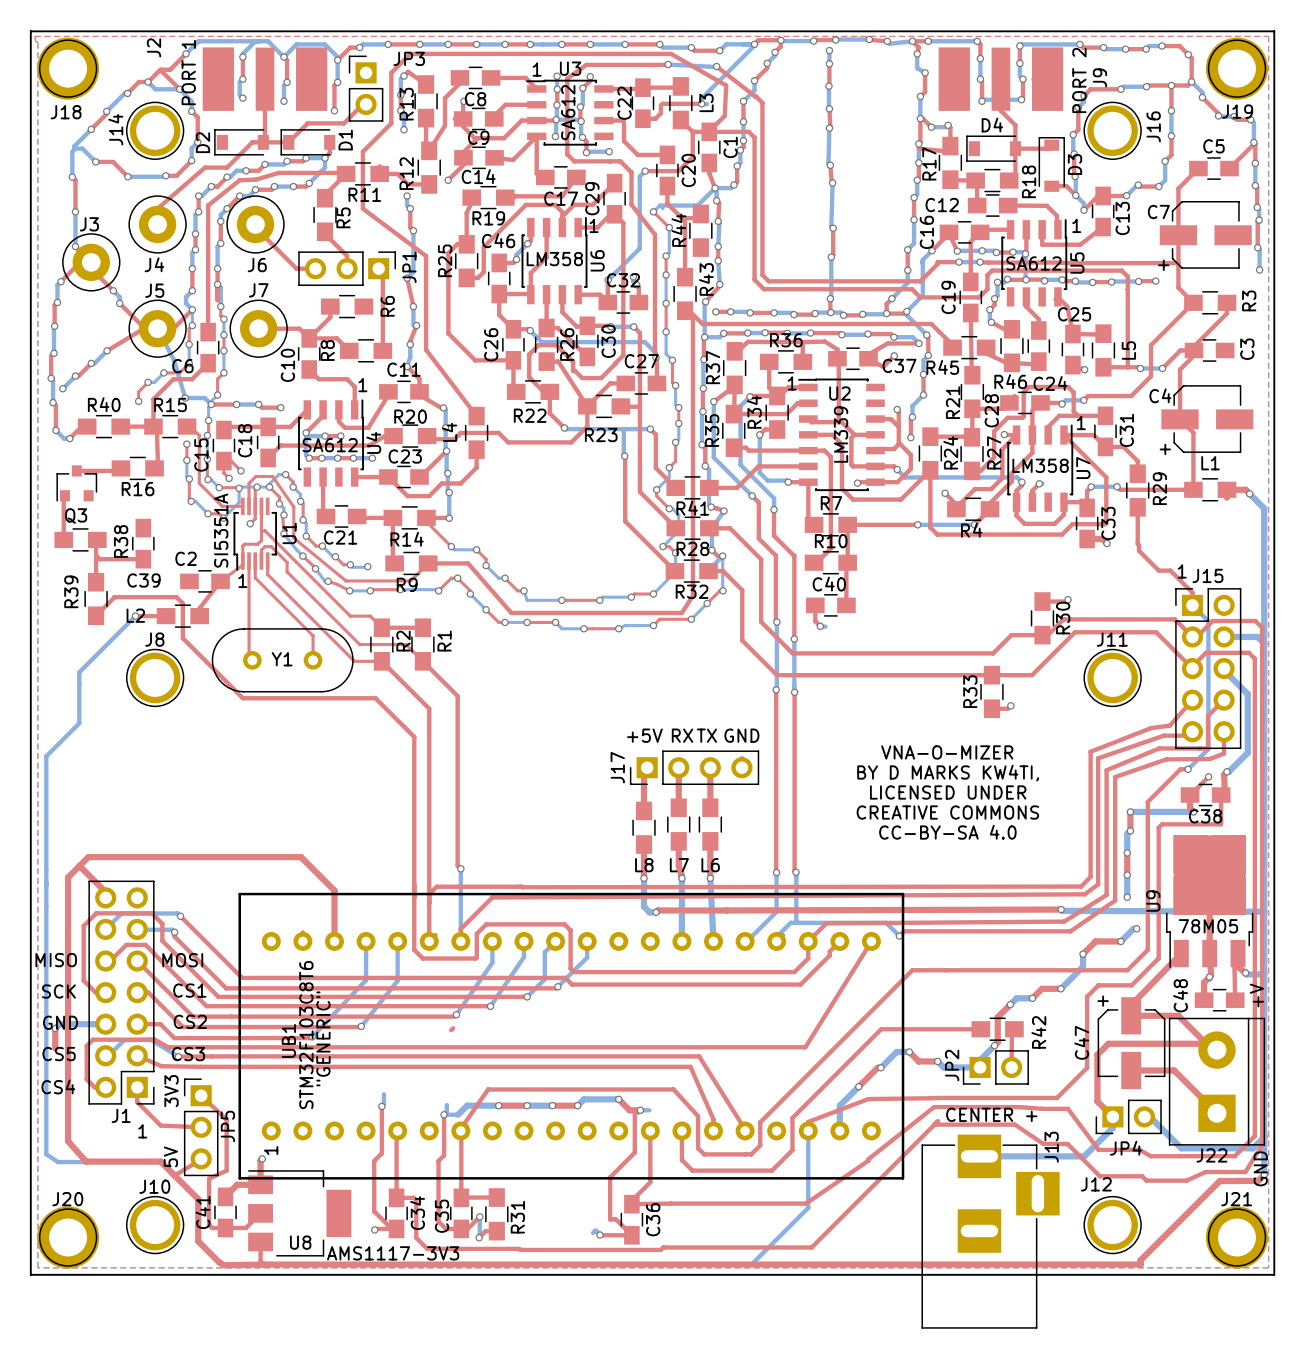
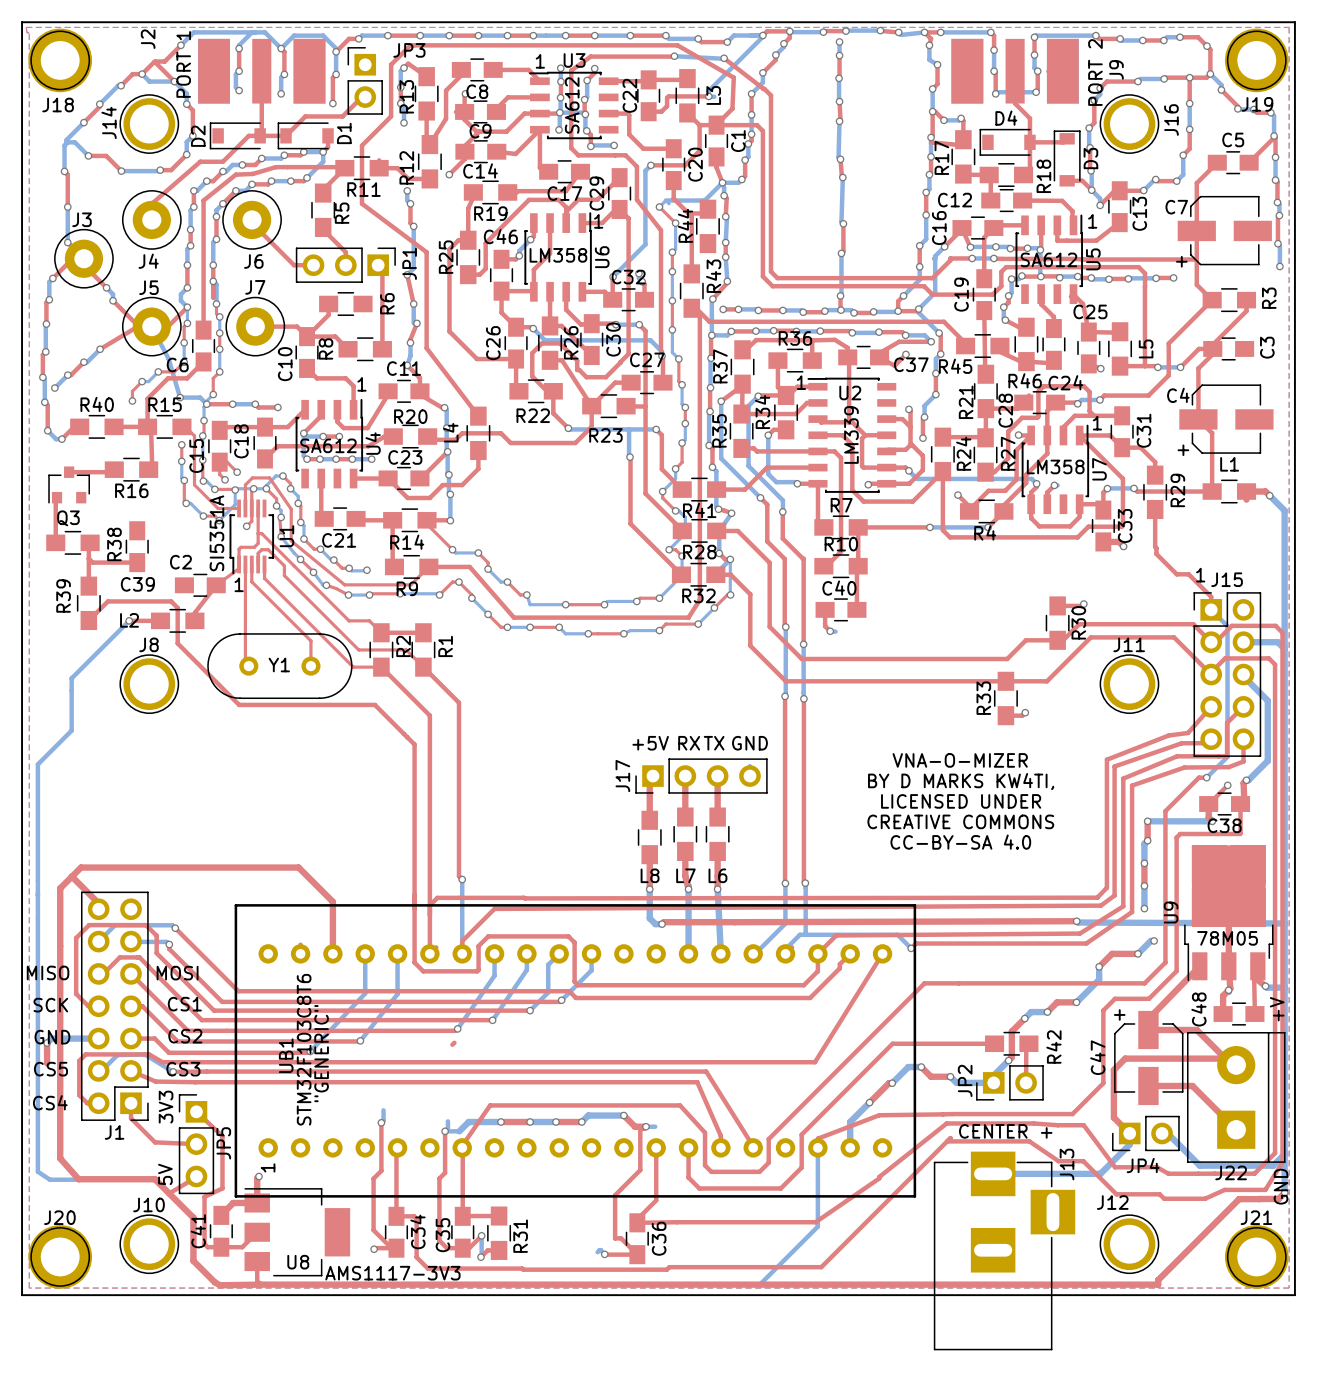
text: 1 (142, 1131) -> none

